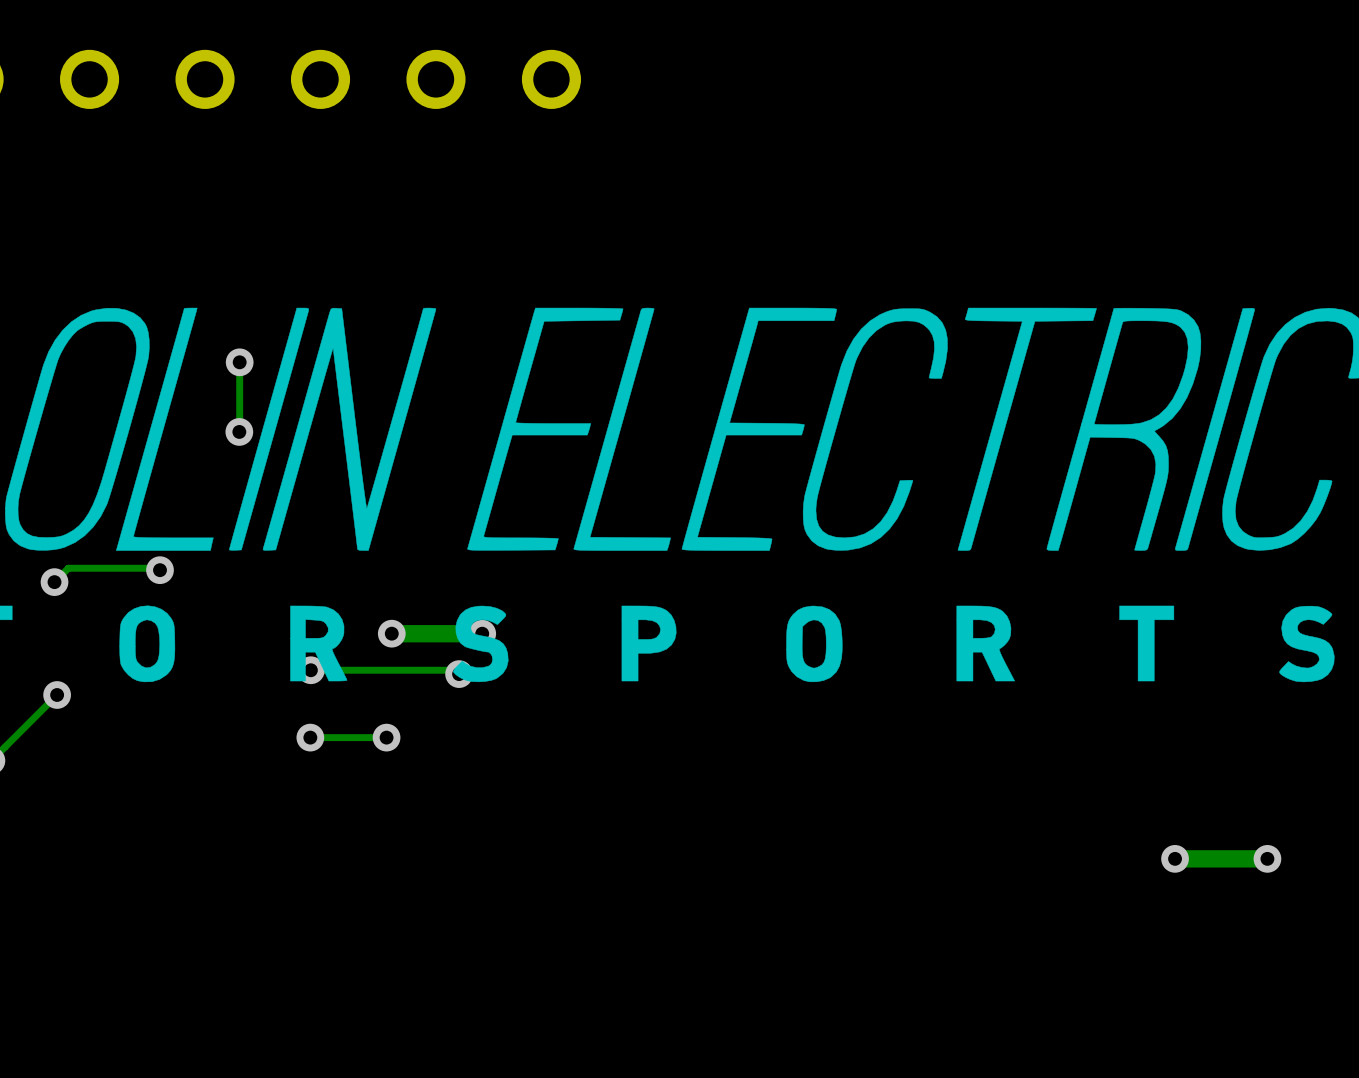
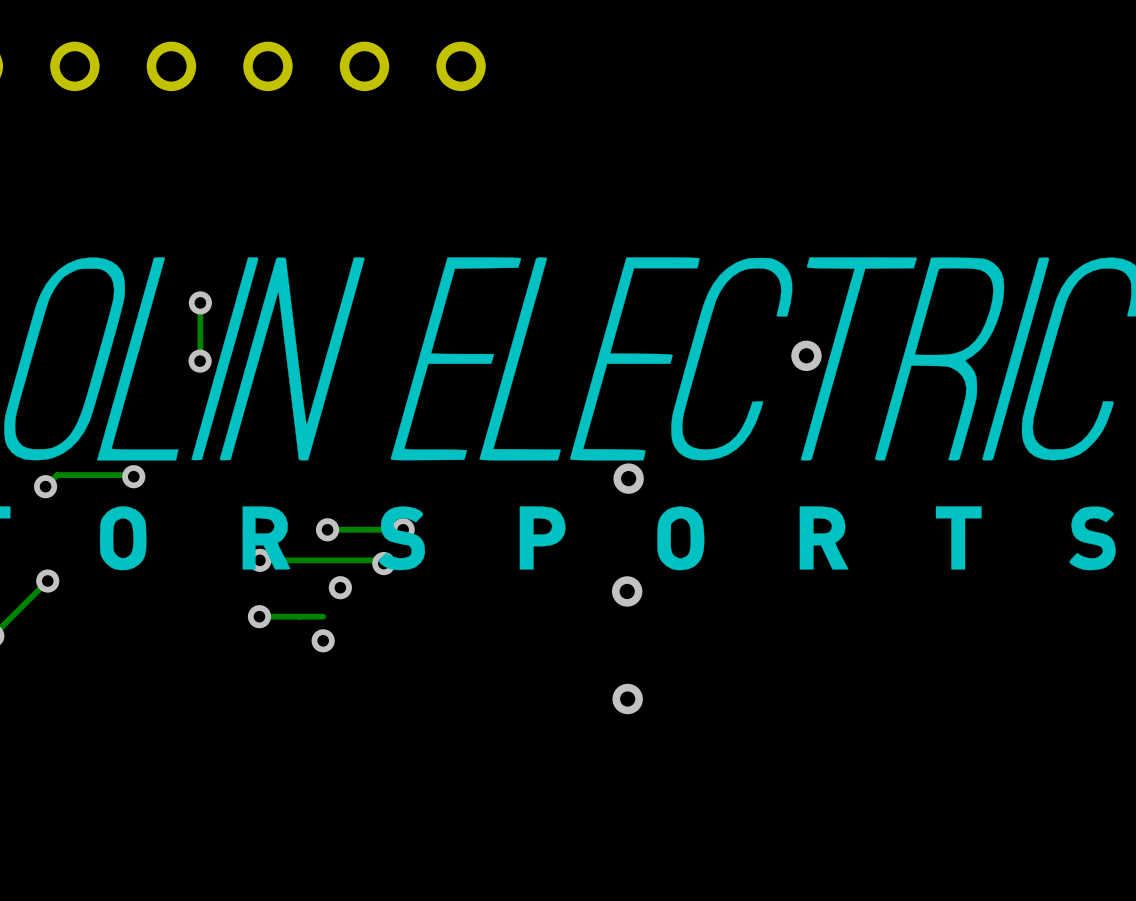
via: none -> (806, 355)
via: none -> (628, 478)
track width: thick (482, 633) (391, 633) -> thin (403, 529) (327, 529)
via: none -> (340, 587)
via: none -> (627, 591)
via: (386, 737) -> none
via: none -> (323, 640)
via: none -> (627, 699)
via: (1175, 858) -> none
track: (1267, 858) (1175, 858) -> none
via: (1267, 858) -> none

